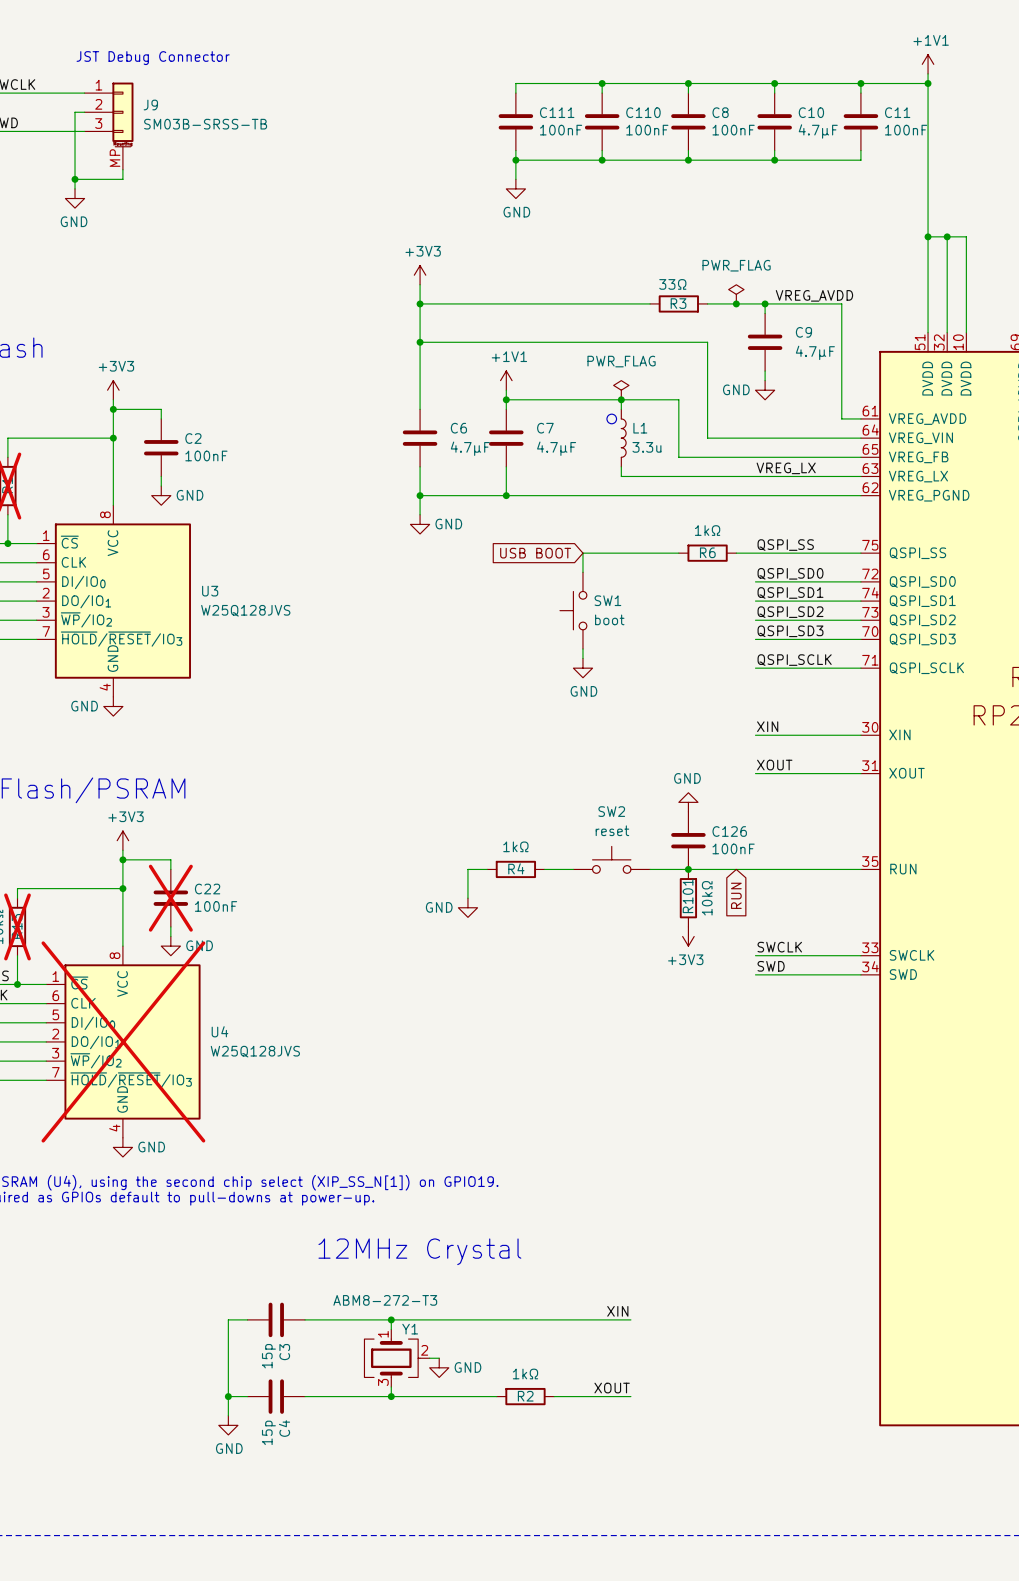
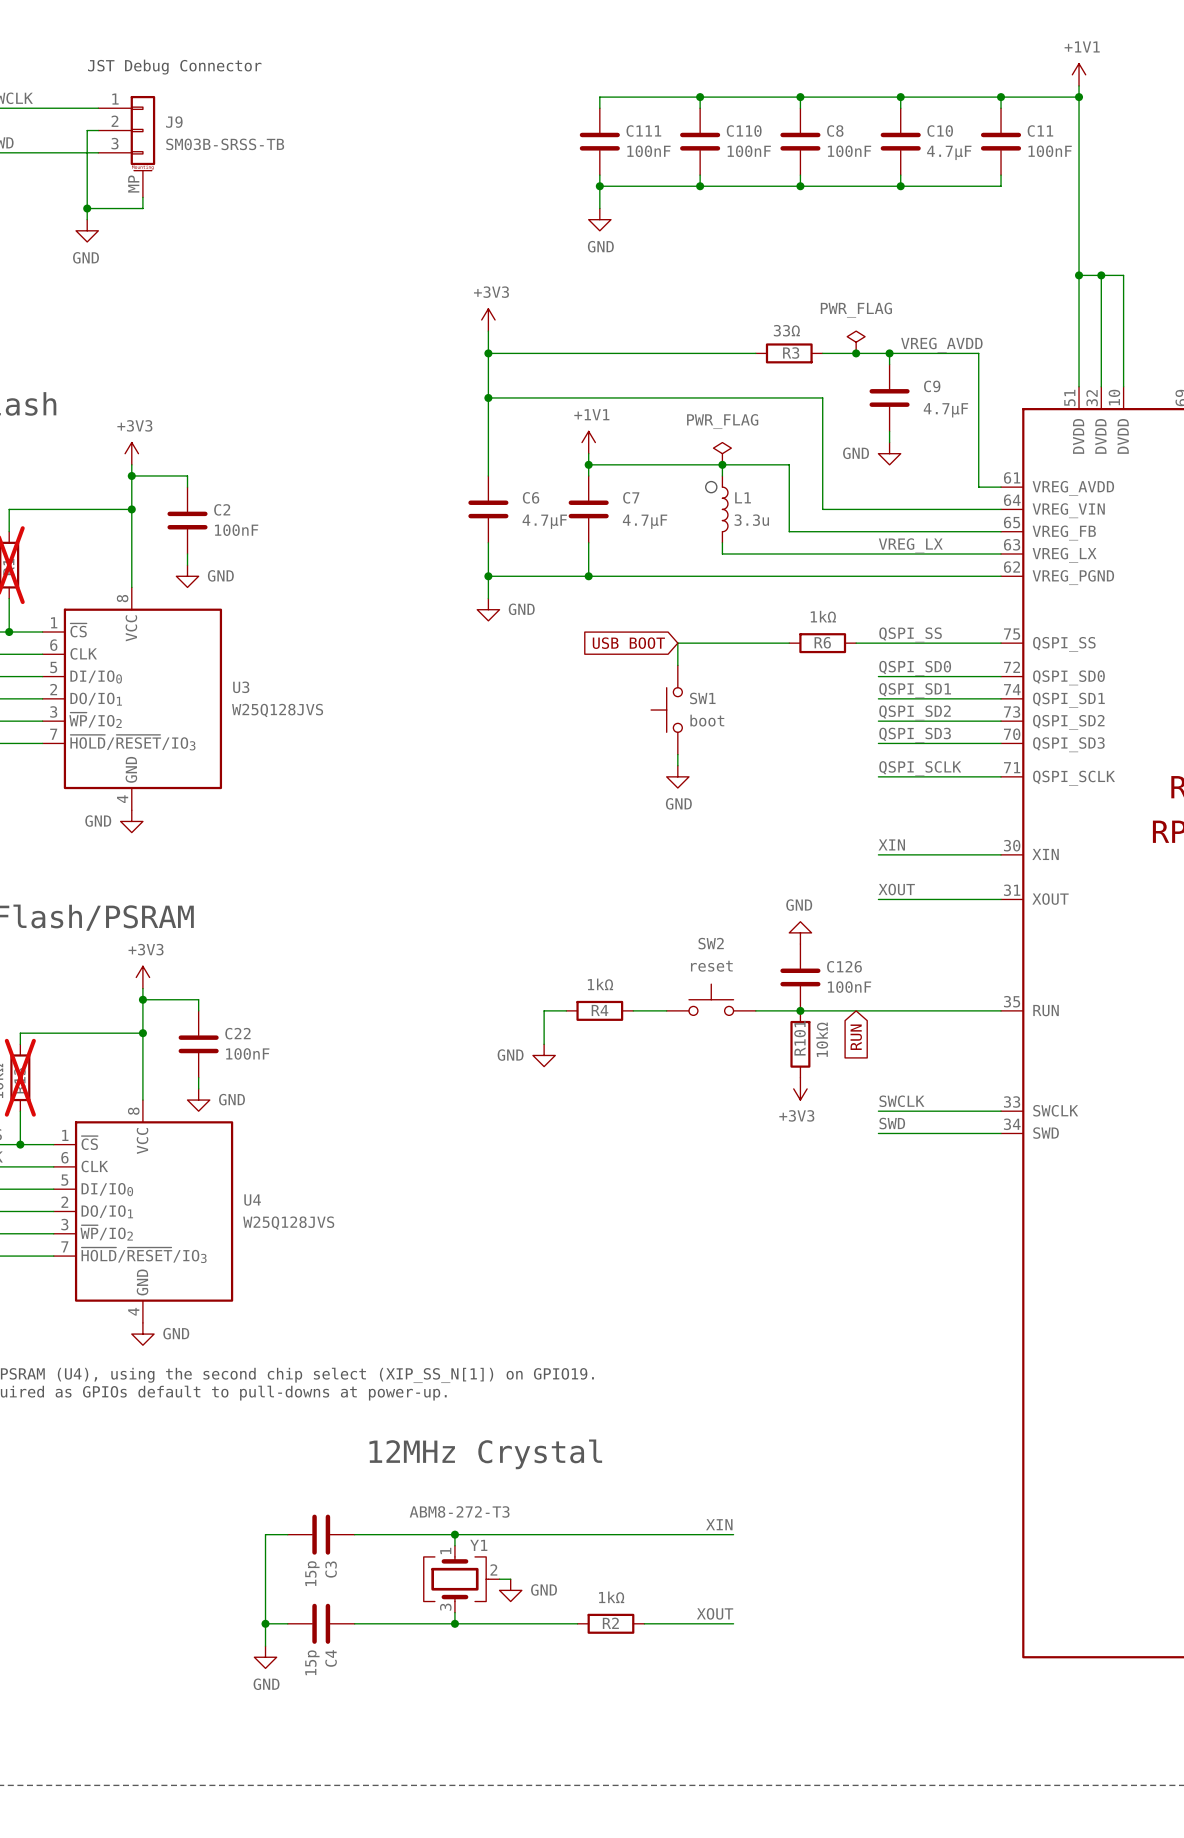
C22 do-not-place cross: (170, 898) -> none
U4 do-not-place cross: (123, 1041) -> none

